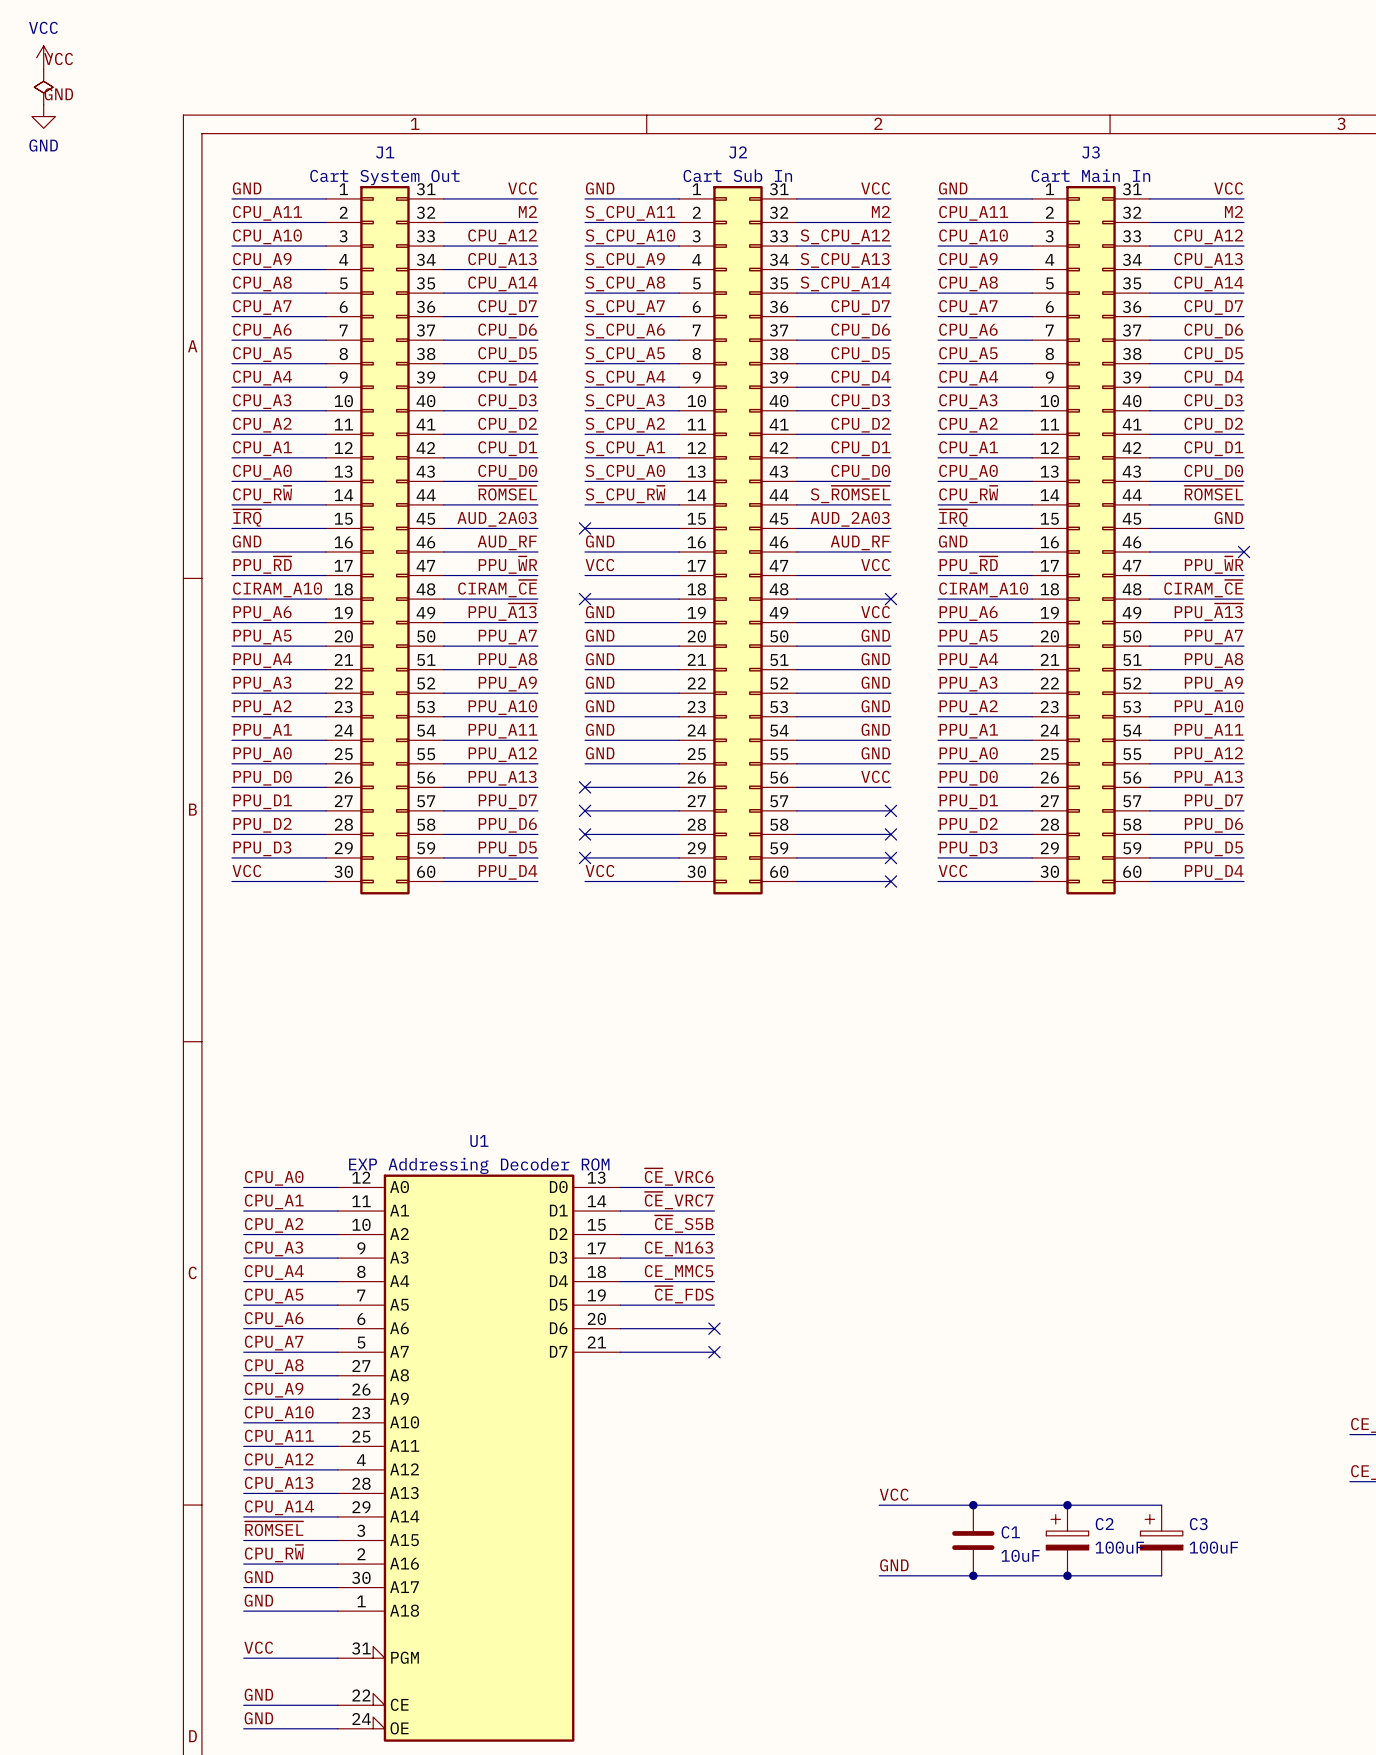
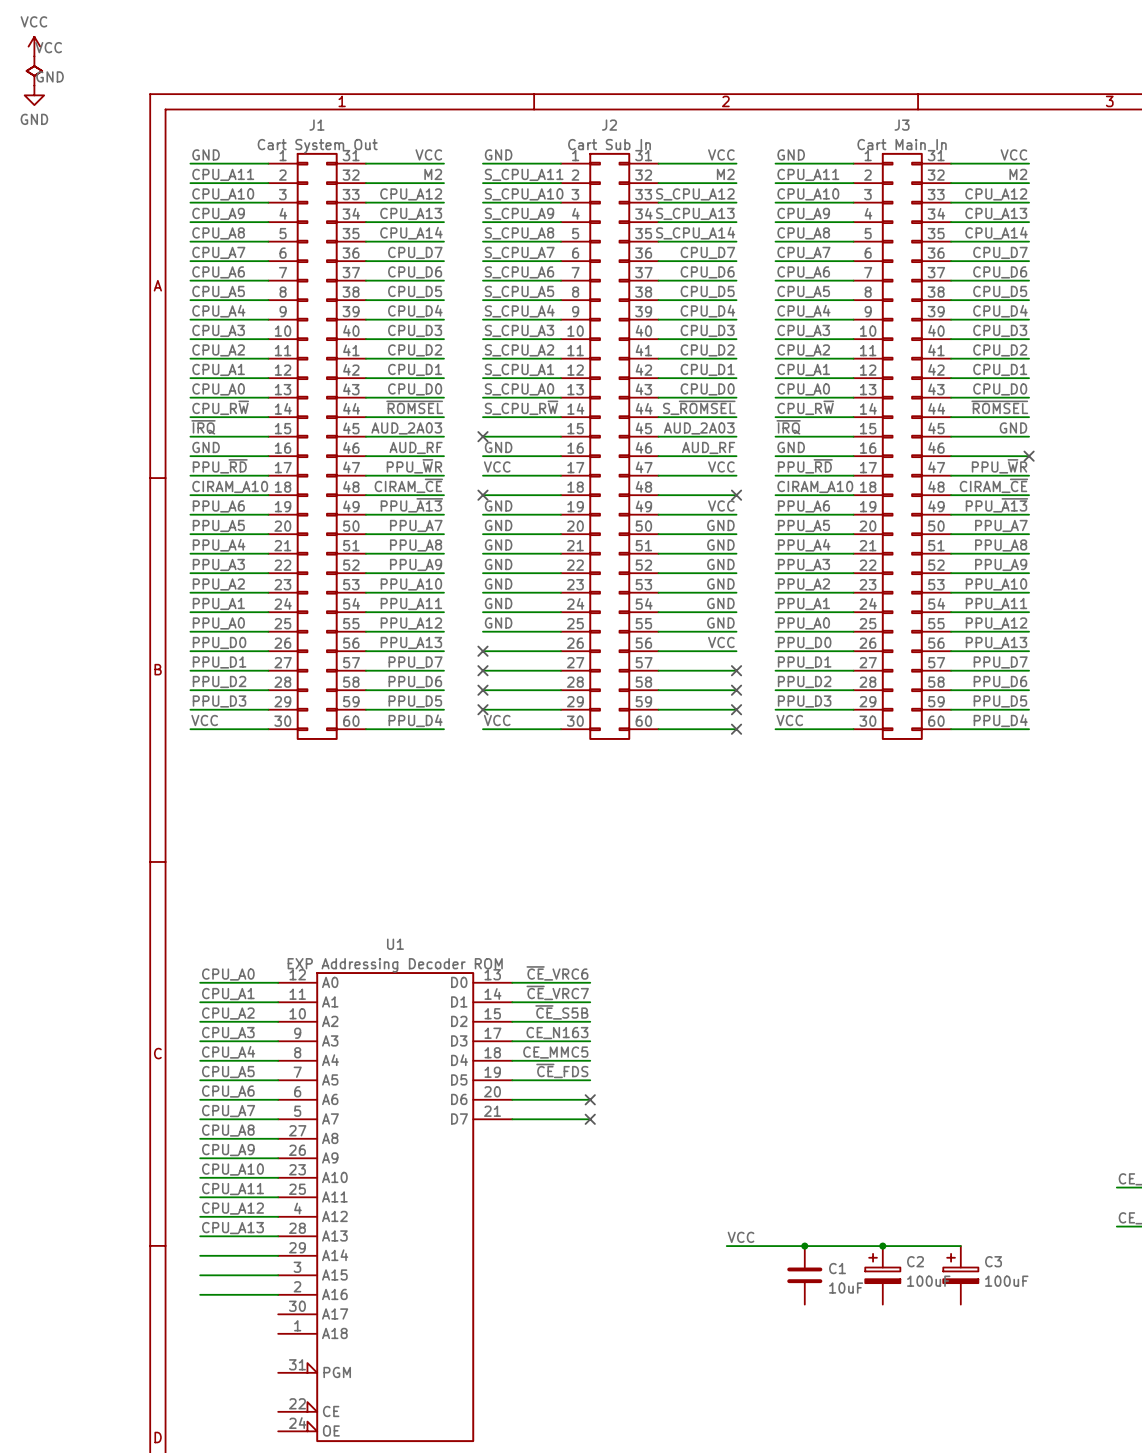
label: CPU_A14 (279, 1507) -> none
label: ~{ROMSEL} (274, 1528) -> none
label: CPU_R~{W} (274, 1553) -> none
label: GND (894, 1565) -> none
wire: (879, 1575) (1161, 1575) -> none
junction: (973, 1575) -> none
junction: (1067, 1575) -> none
label: GND (258, 1577) -> none
wire: (243, 1587) (337, 1587) -> none
label: GND (258, 1600) -> none
wire: (243, 1611) (337, 1611) -> none
label: VCC (258, 1647) -> none
wire: (243, 1658) (337, 1658) -> none
label: GND (258, 1694) -> none
wire: (243, 1705) (337, 1705) -> none
label: GND (258, 1718) -> none
wire: (243, 1728) (337, 1728) -> none

